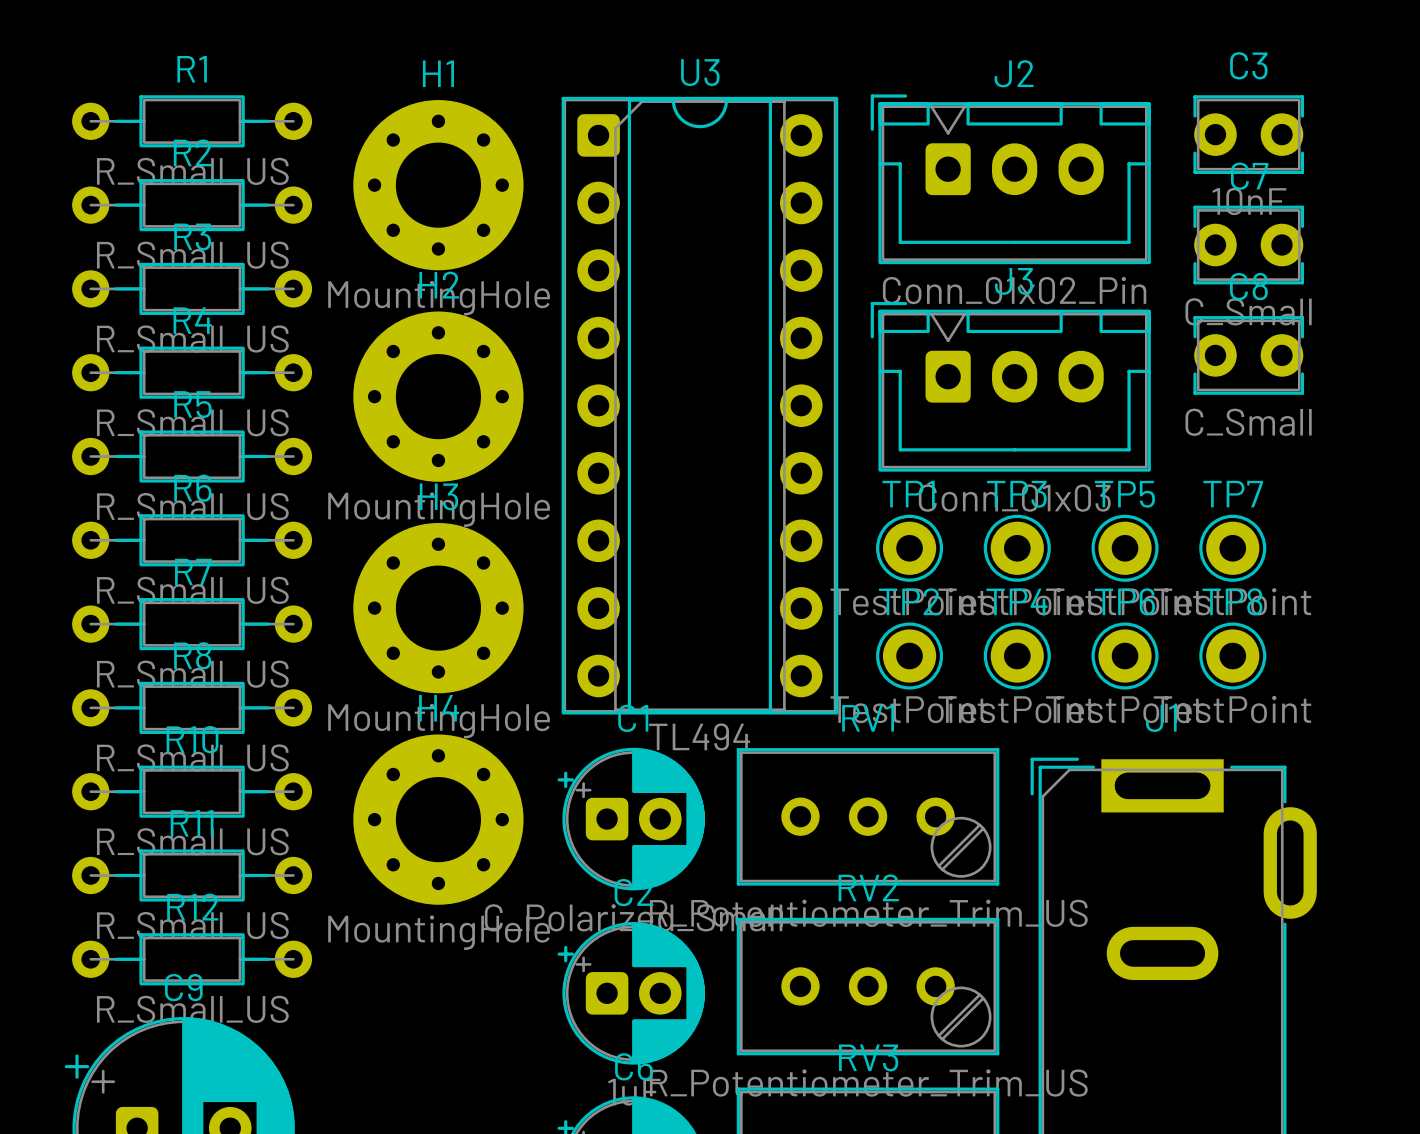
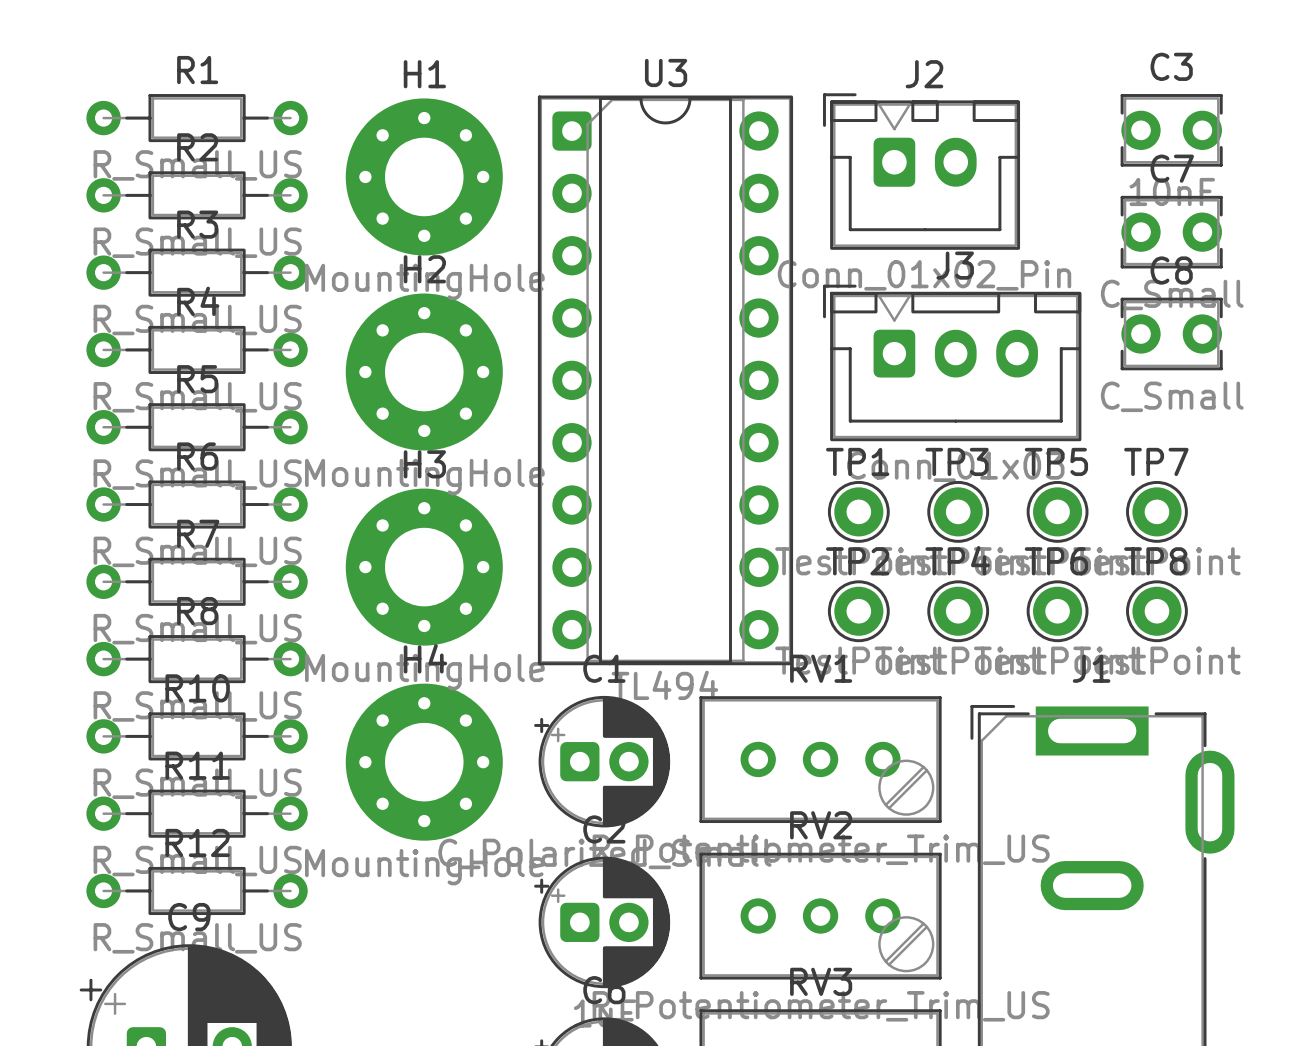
J2 footprint: [870, 94, 1151, 265] -> [823, 93, 1021, 250]

